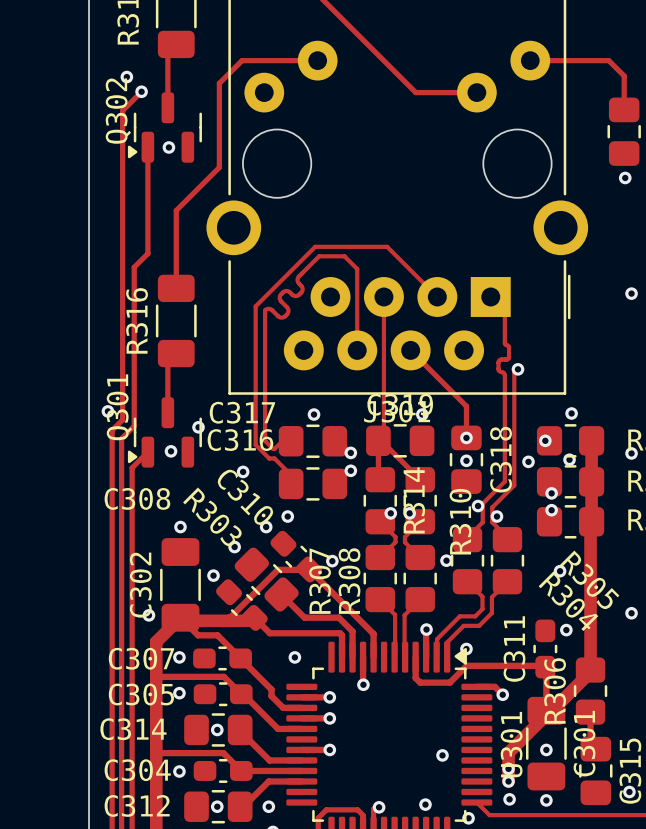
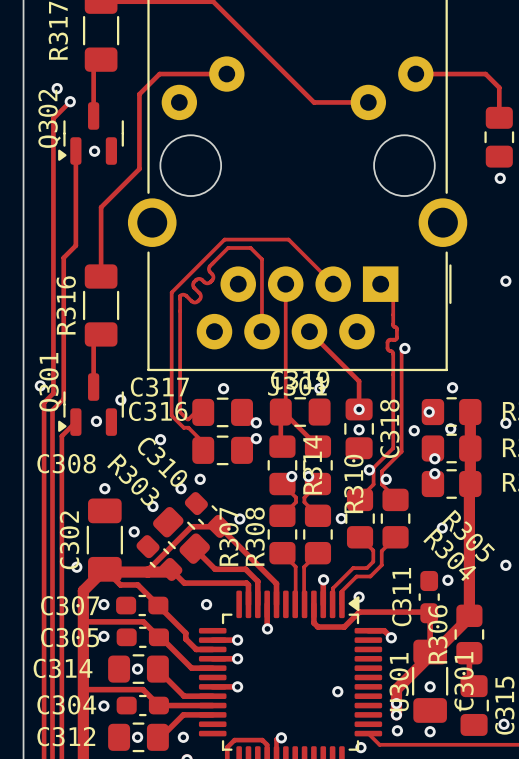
via: (425, 804) -> none

